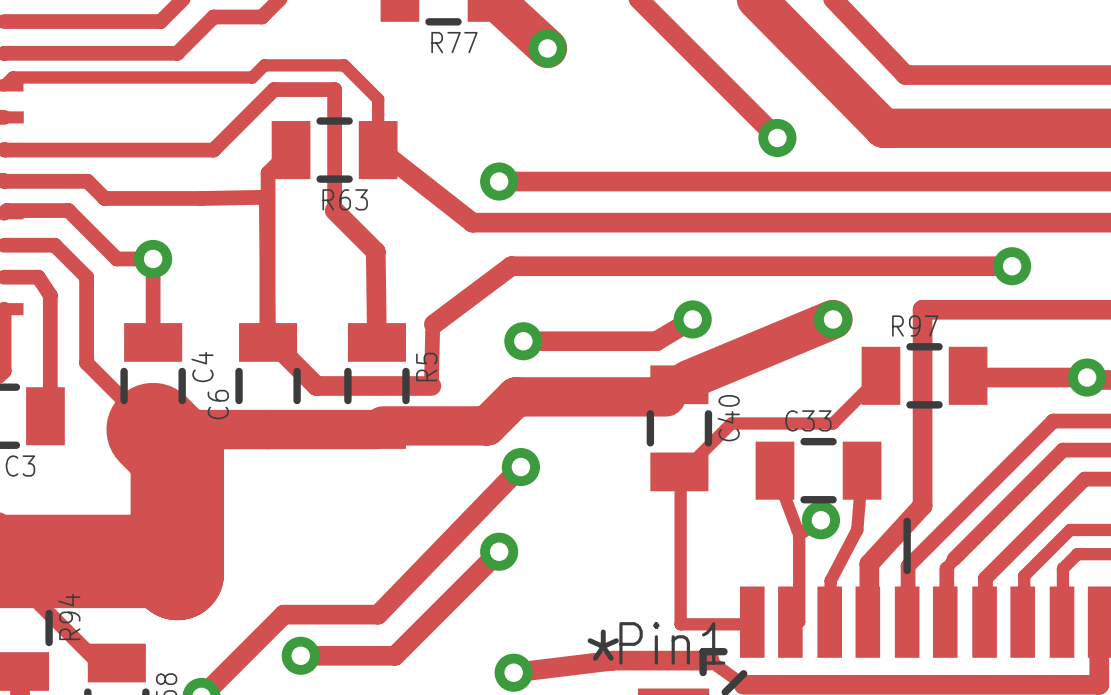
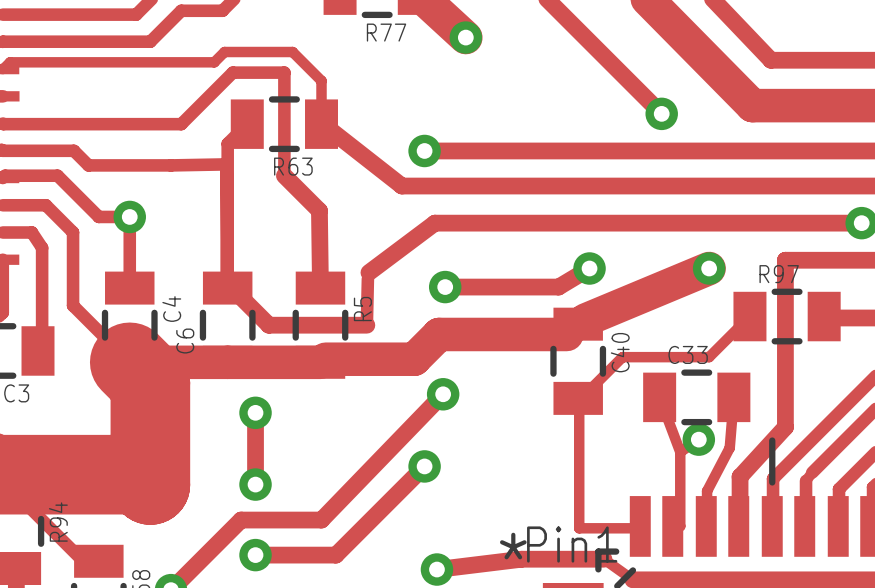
track: none -> (255, 412) (255, 484)
via: none -> (255, 412)
via: none -> (255, 484)

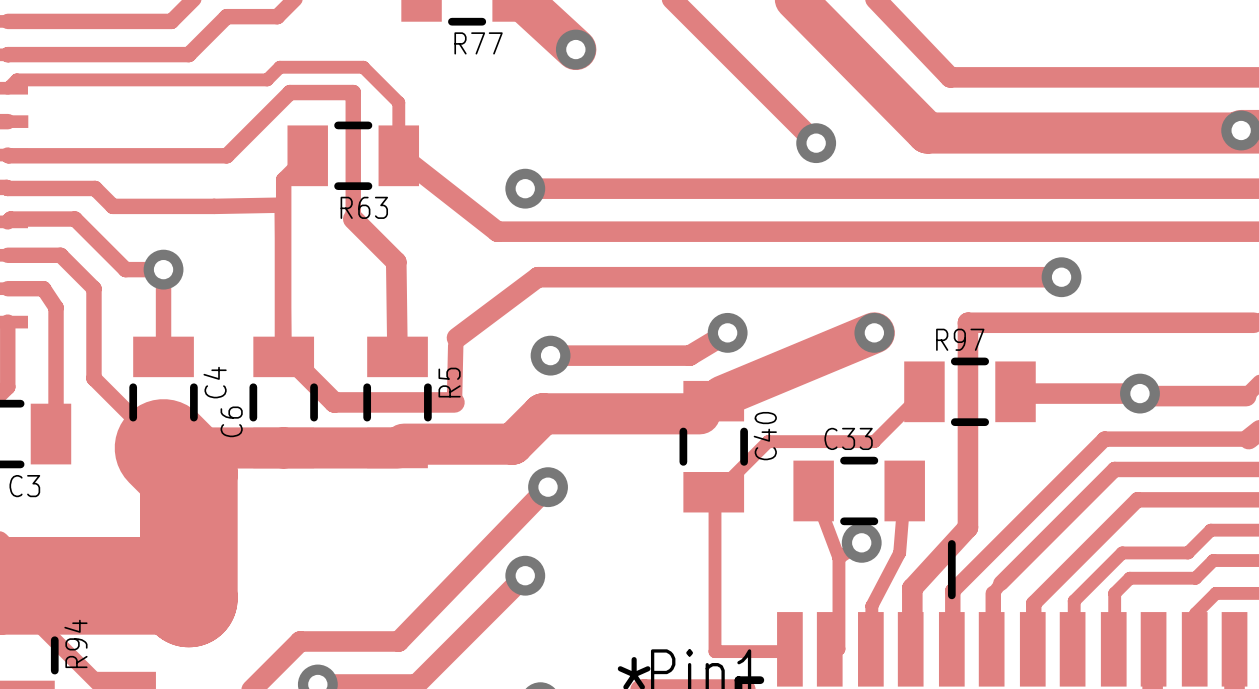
track: (255, 412) (255, 484) -> none
via: (255, 412) -> none
via: (255, 484) -> none

